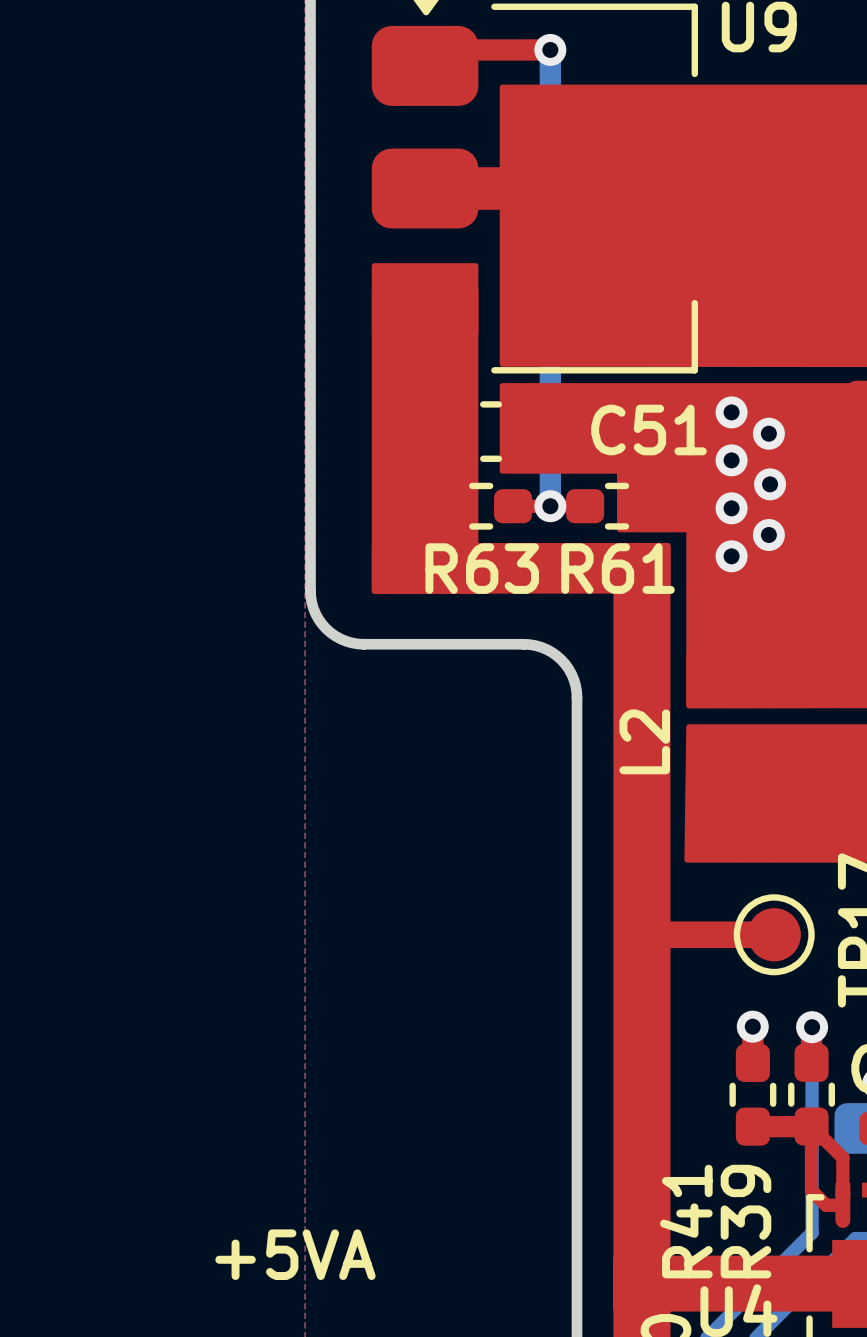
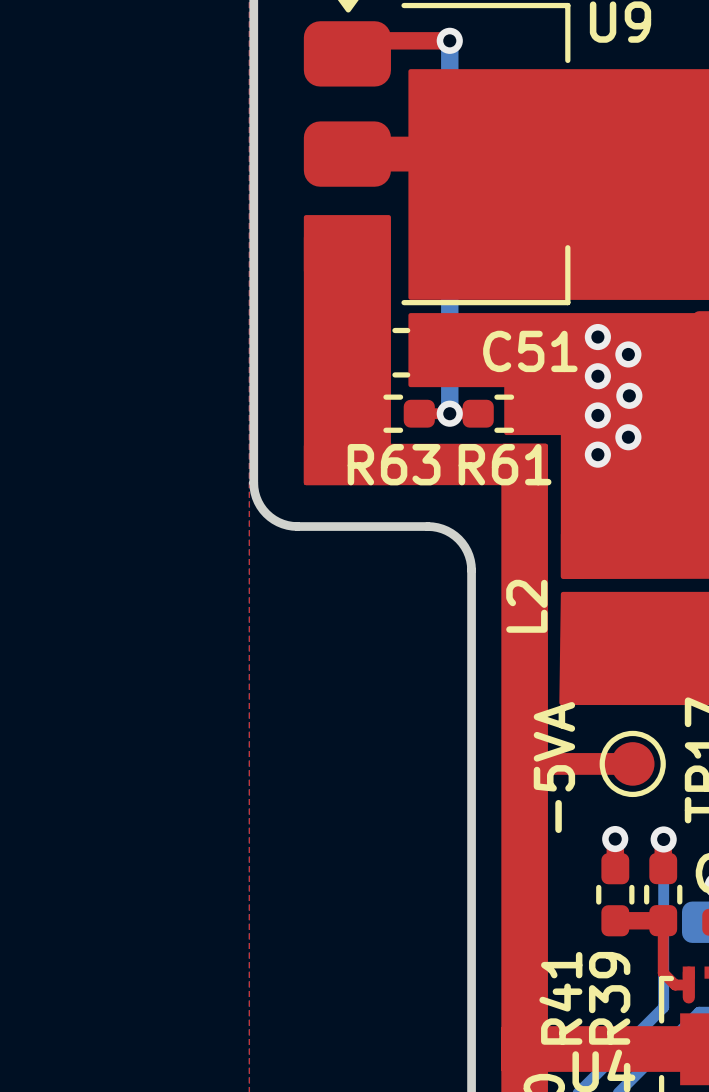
text: none -> -5VA (554, 767)
top track: (811, 1126) (842, 1157) (842, 1190) -> none
text: +5VA (295, 1254) -> none

